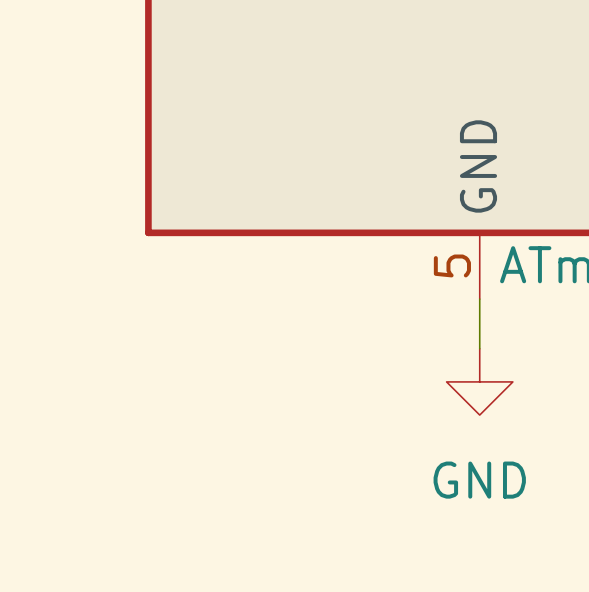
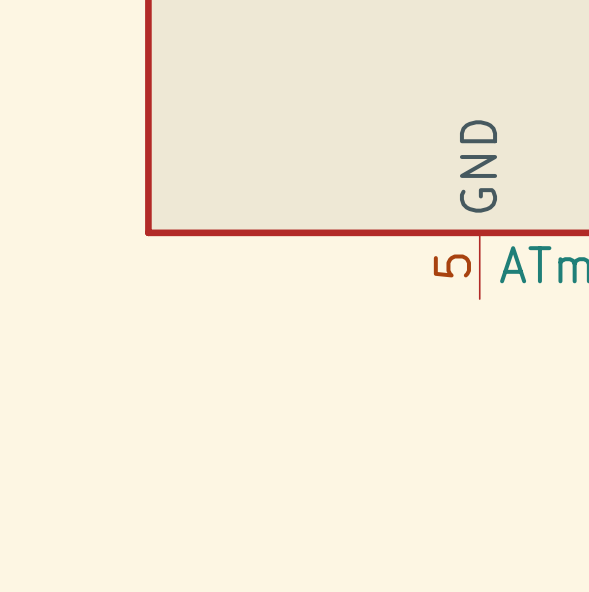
wire: (479, 299) (479, 348) -> none
power symbol: GND (479, 381) -> none

